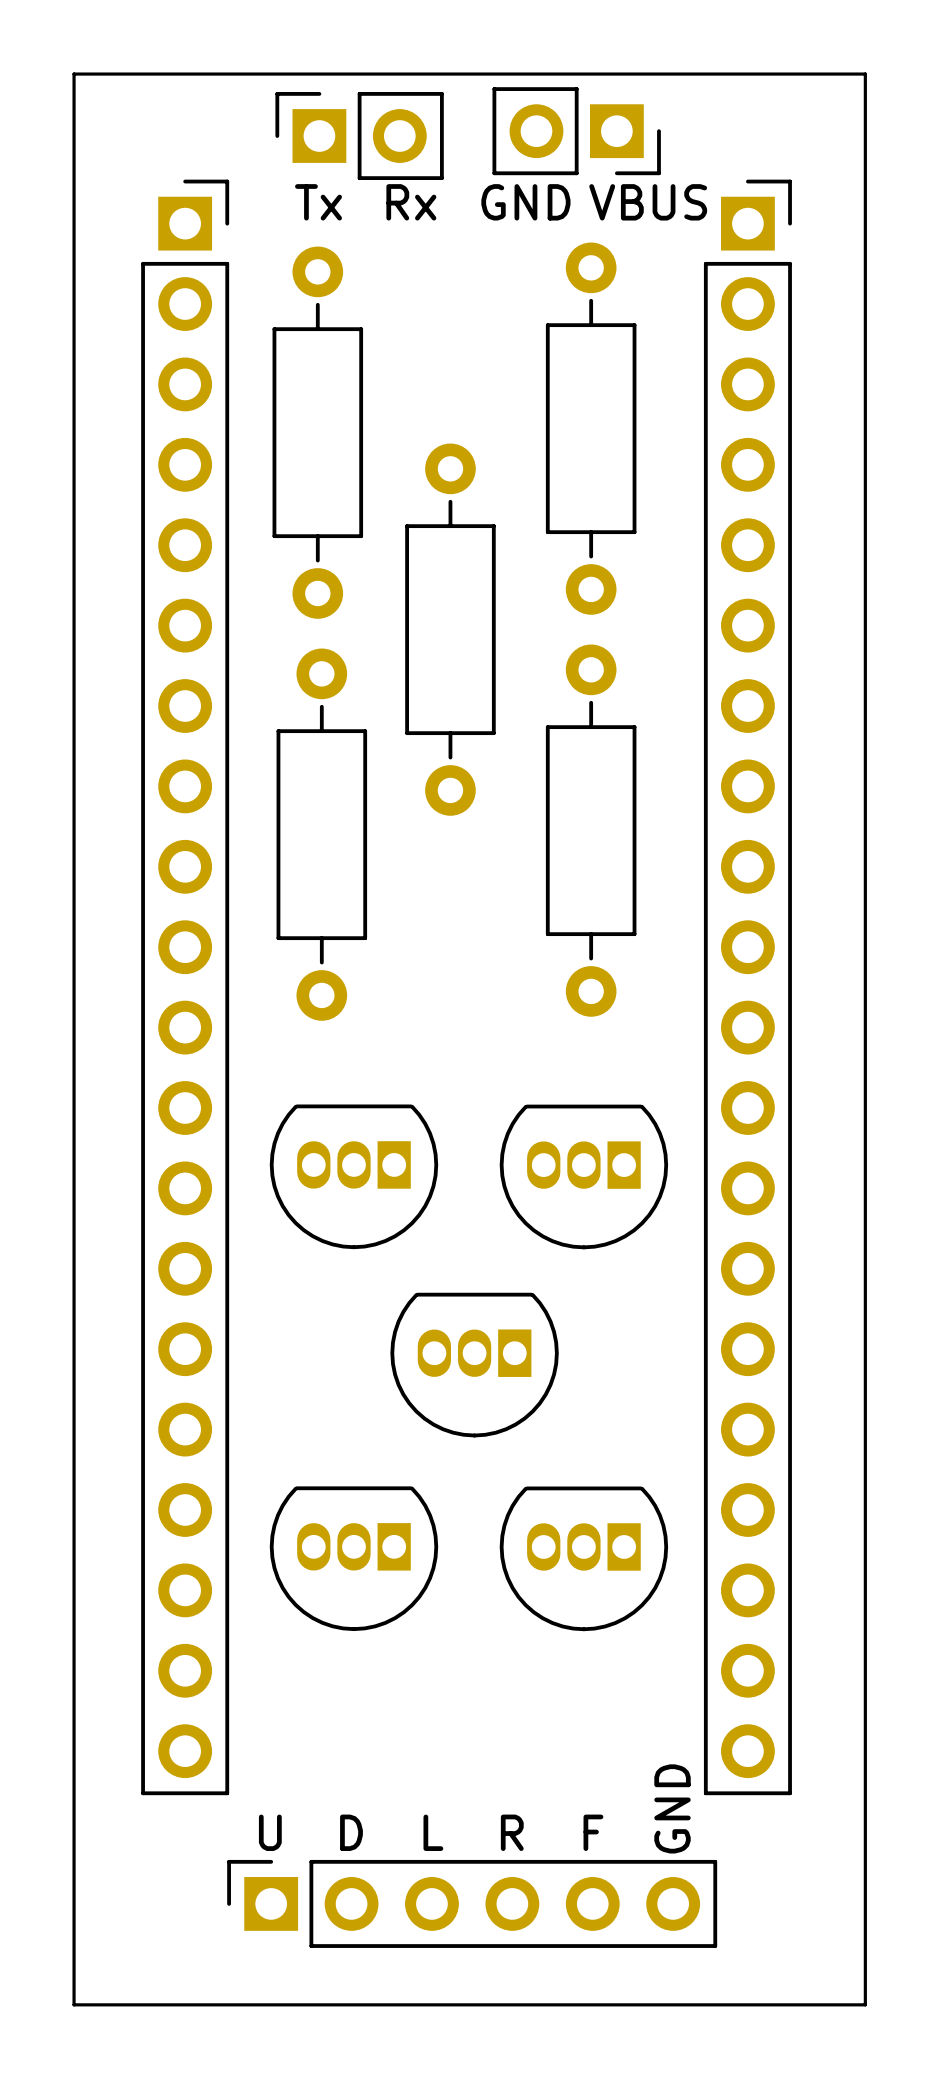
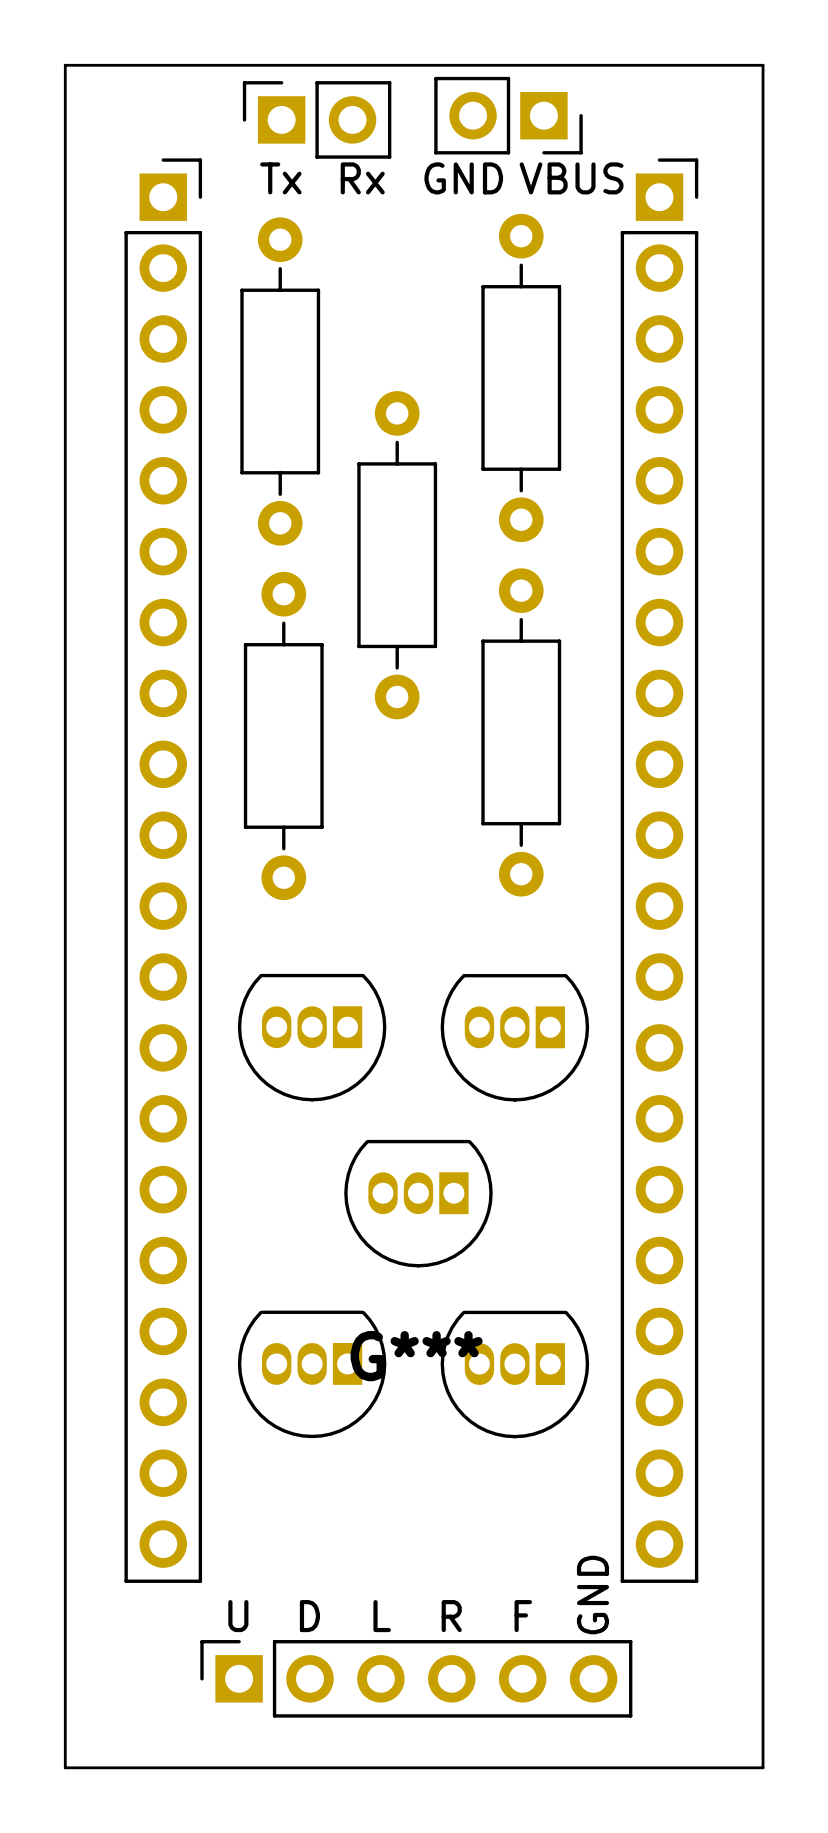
G***: none -> (416, 1356)

